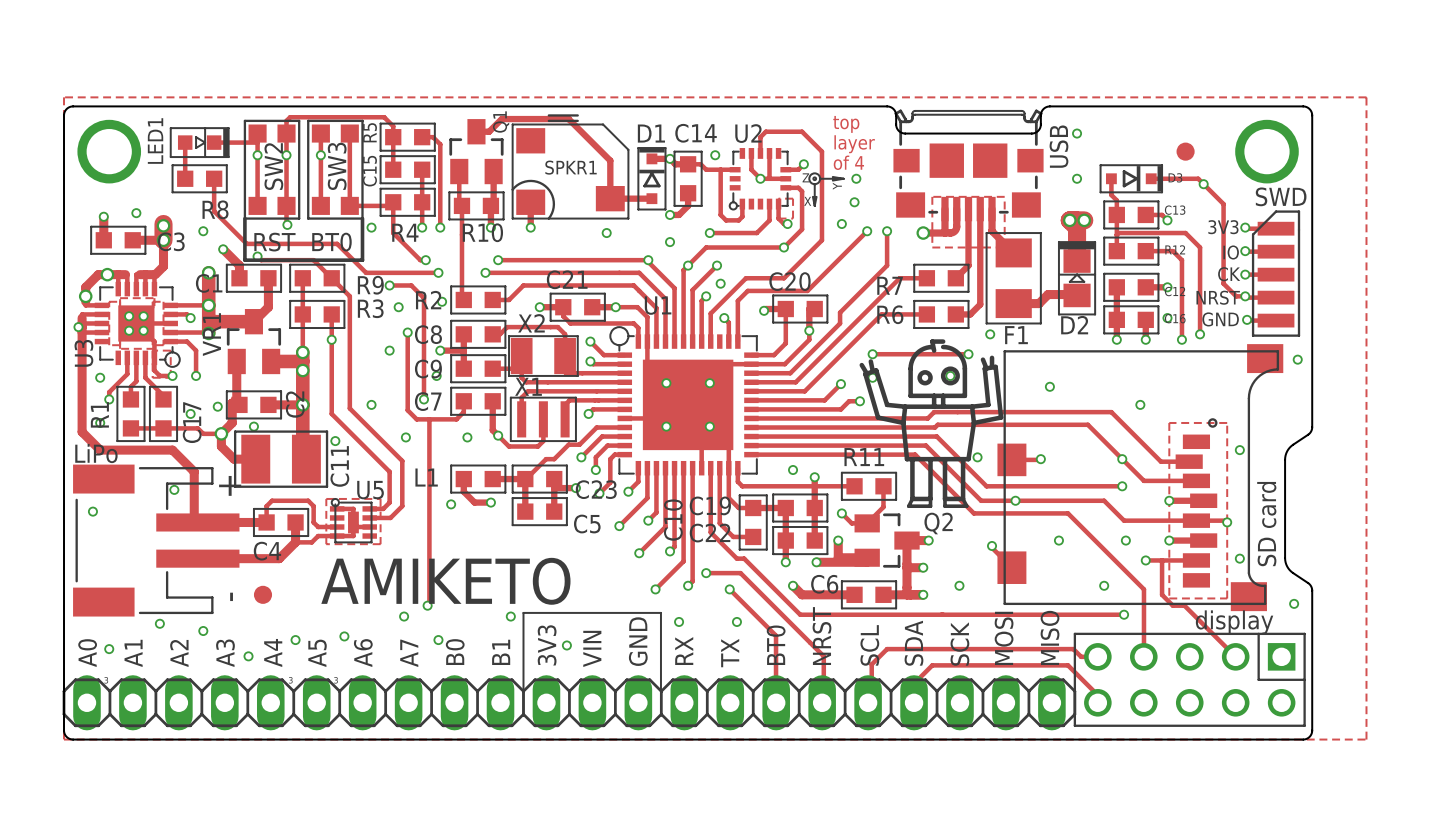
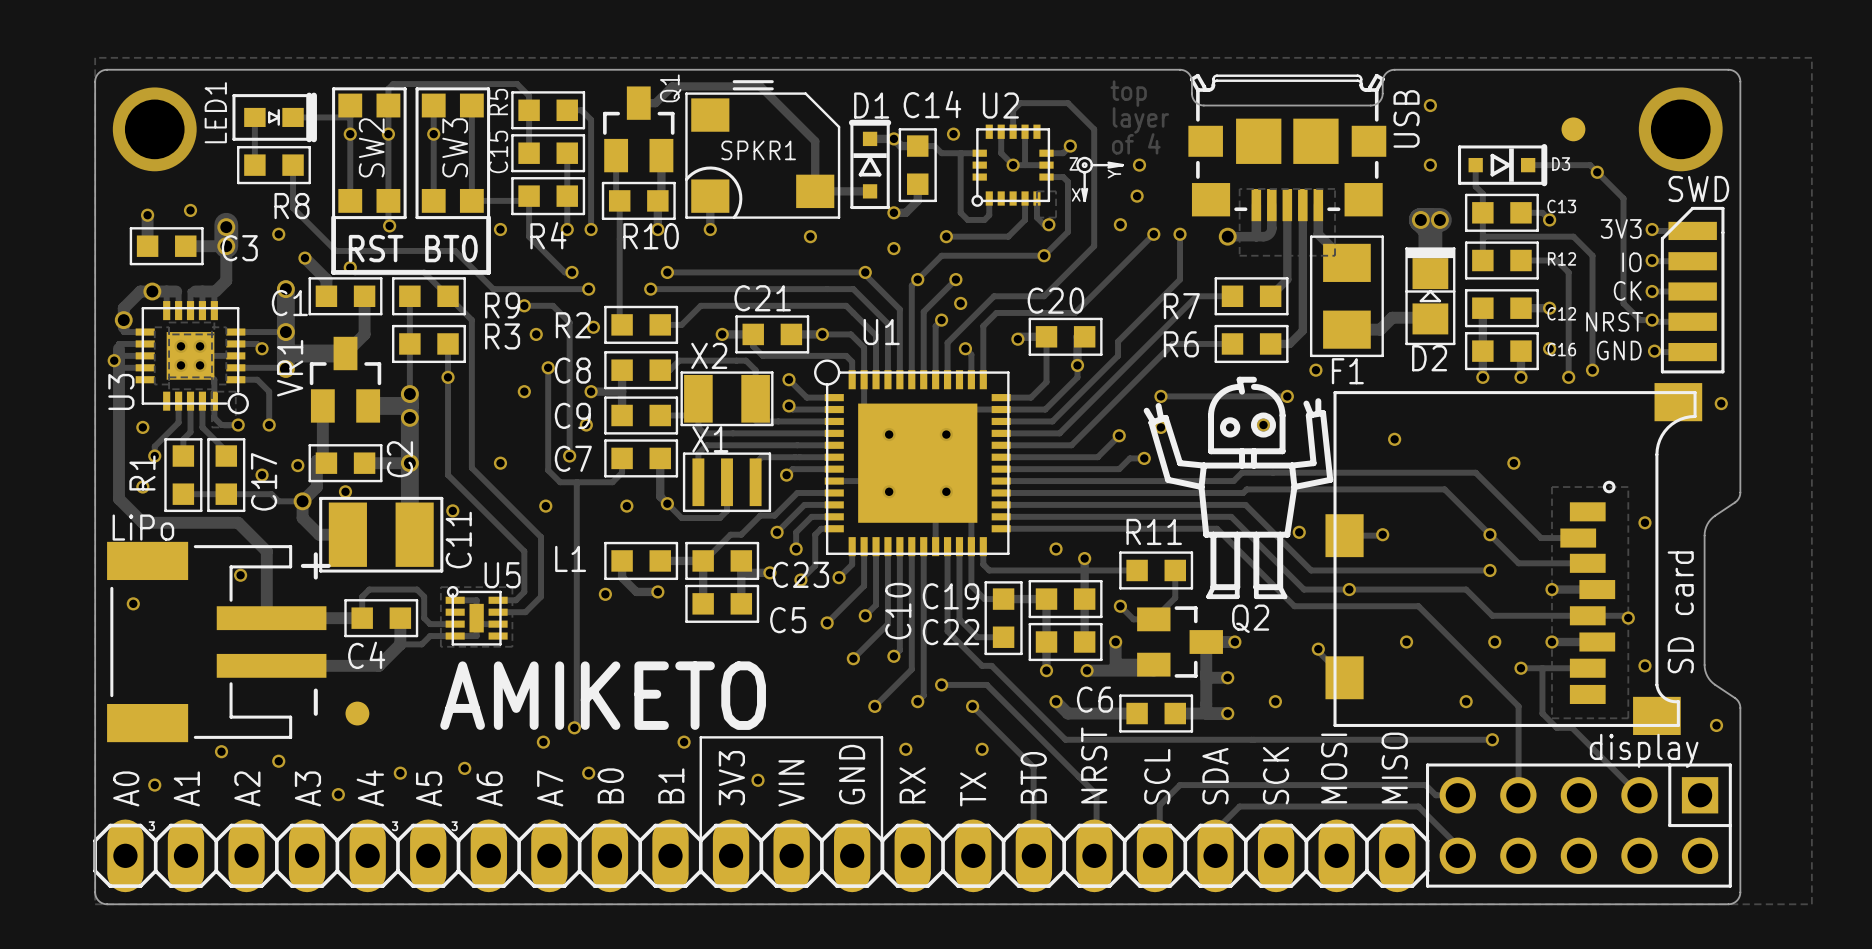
LED1 footprint: [169, 127, 230, 158] -> [232, 92, 317, 143]
D1 footprint: [637, 147, 667, 211] -> [848, 119, 892, 210]
U2 footprint: [728, 148, 792, 211] -> [971, 124, 1054, 207]
D3 footprint: [1099, 164, 1163, 194] -> [1458, 143, 1548, 187]
U3 footprint: [94, 281, 181, 368] -> [135, 301, 249, 415]
U1 footprint: [609, 326, 759, 476] -> [814, 359, 1011, 557]

